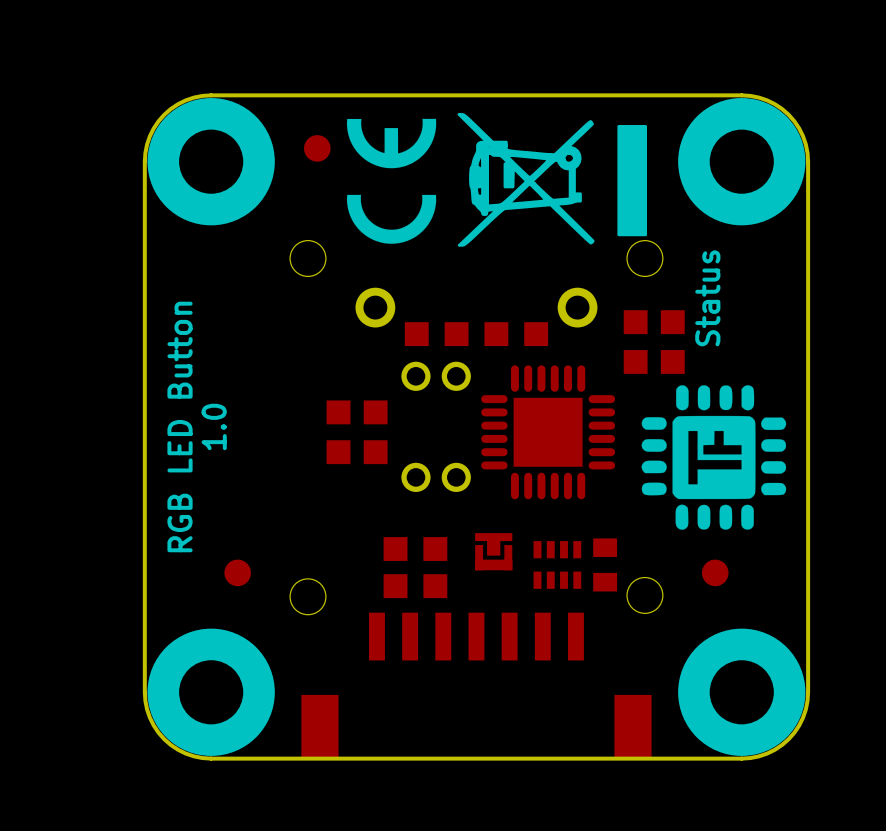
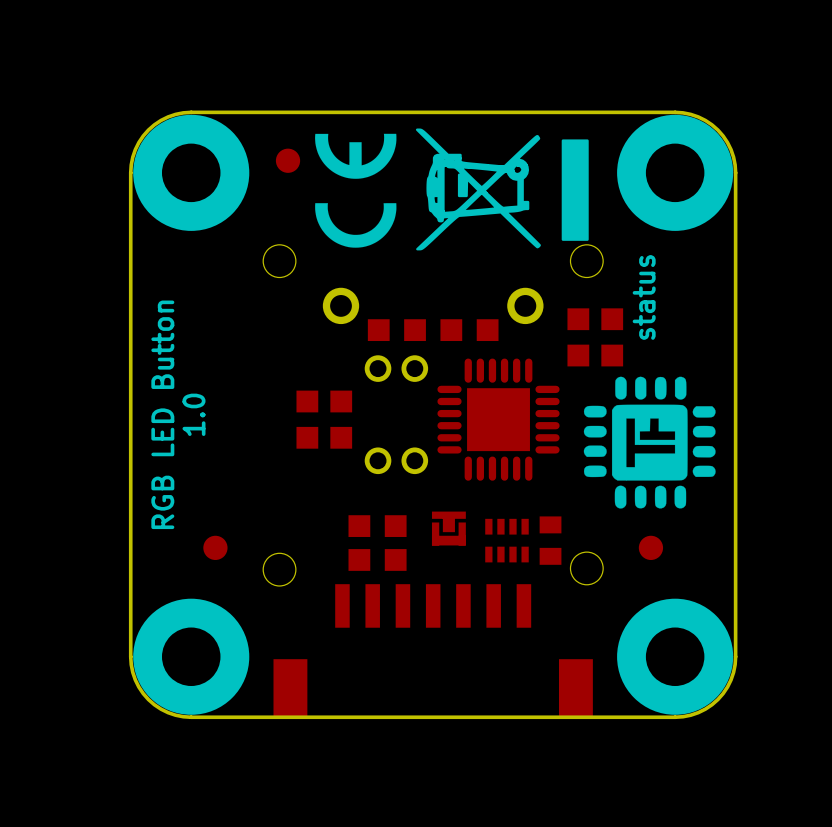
text: Status (707, 298) -> status (644, 297)

